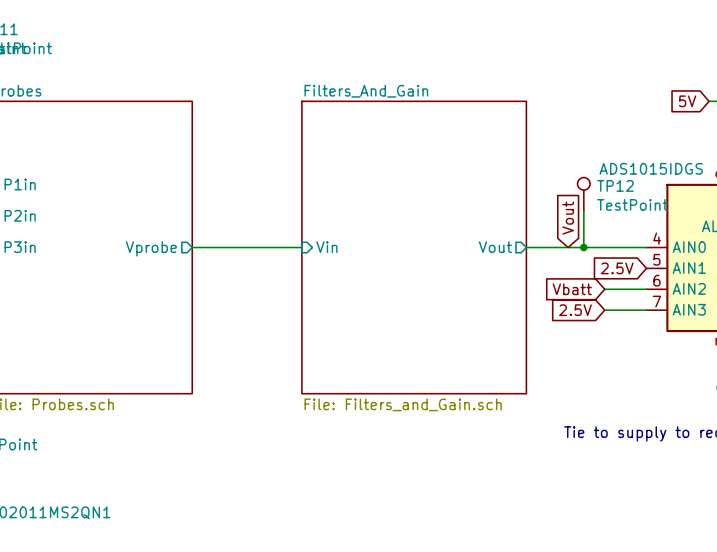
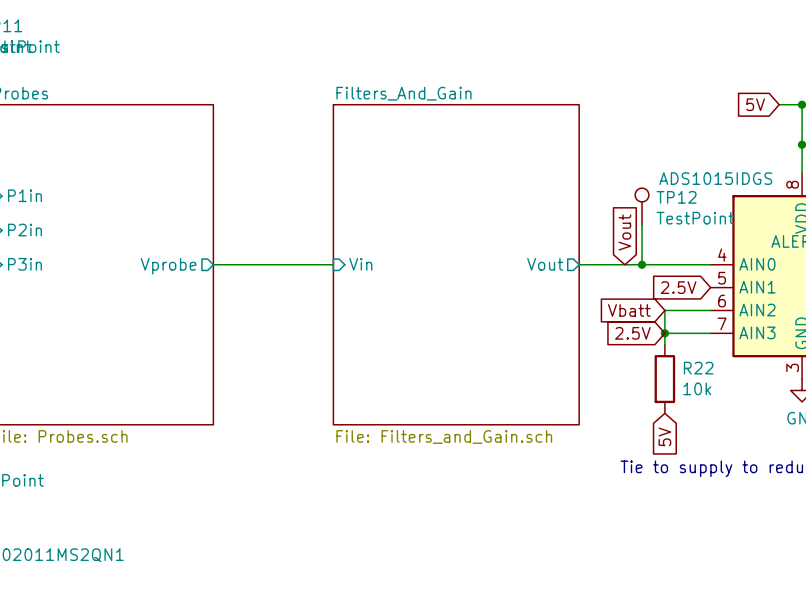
wire: none -> (664, 310) (664, 344)
junction: none -> (664, 333)
R22: none -> 10k (664, 379)
global label: none -> 5V (664, 436)

